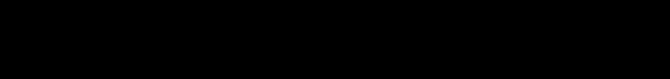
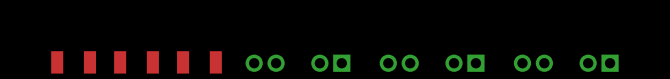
part: none -> (73, 62)
part: none -> (136, 62)
part: none -> (199, 62)
part: none -> (297, 63)
part: none -> (432, 63)
part: none -> (566, 63)

